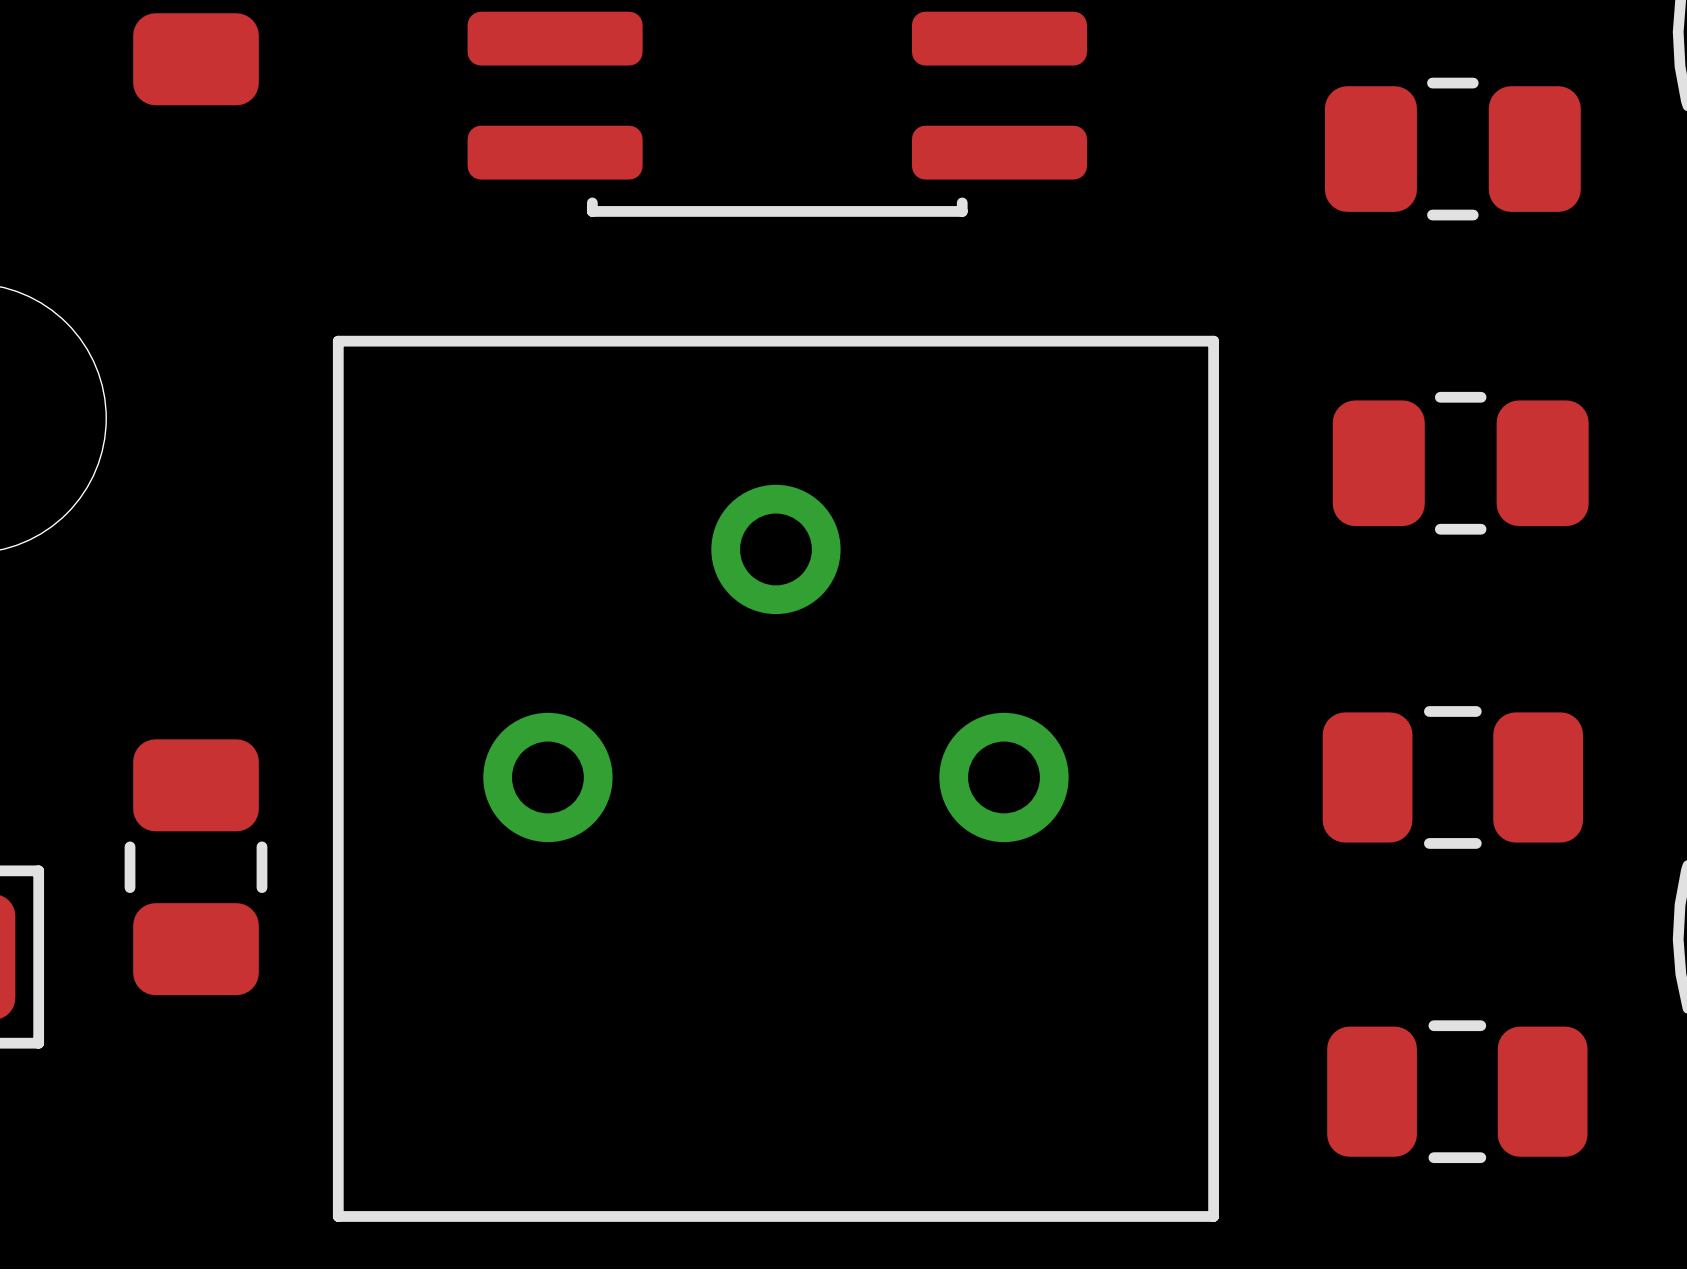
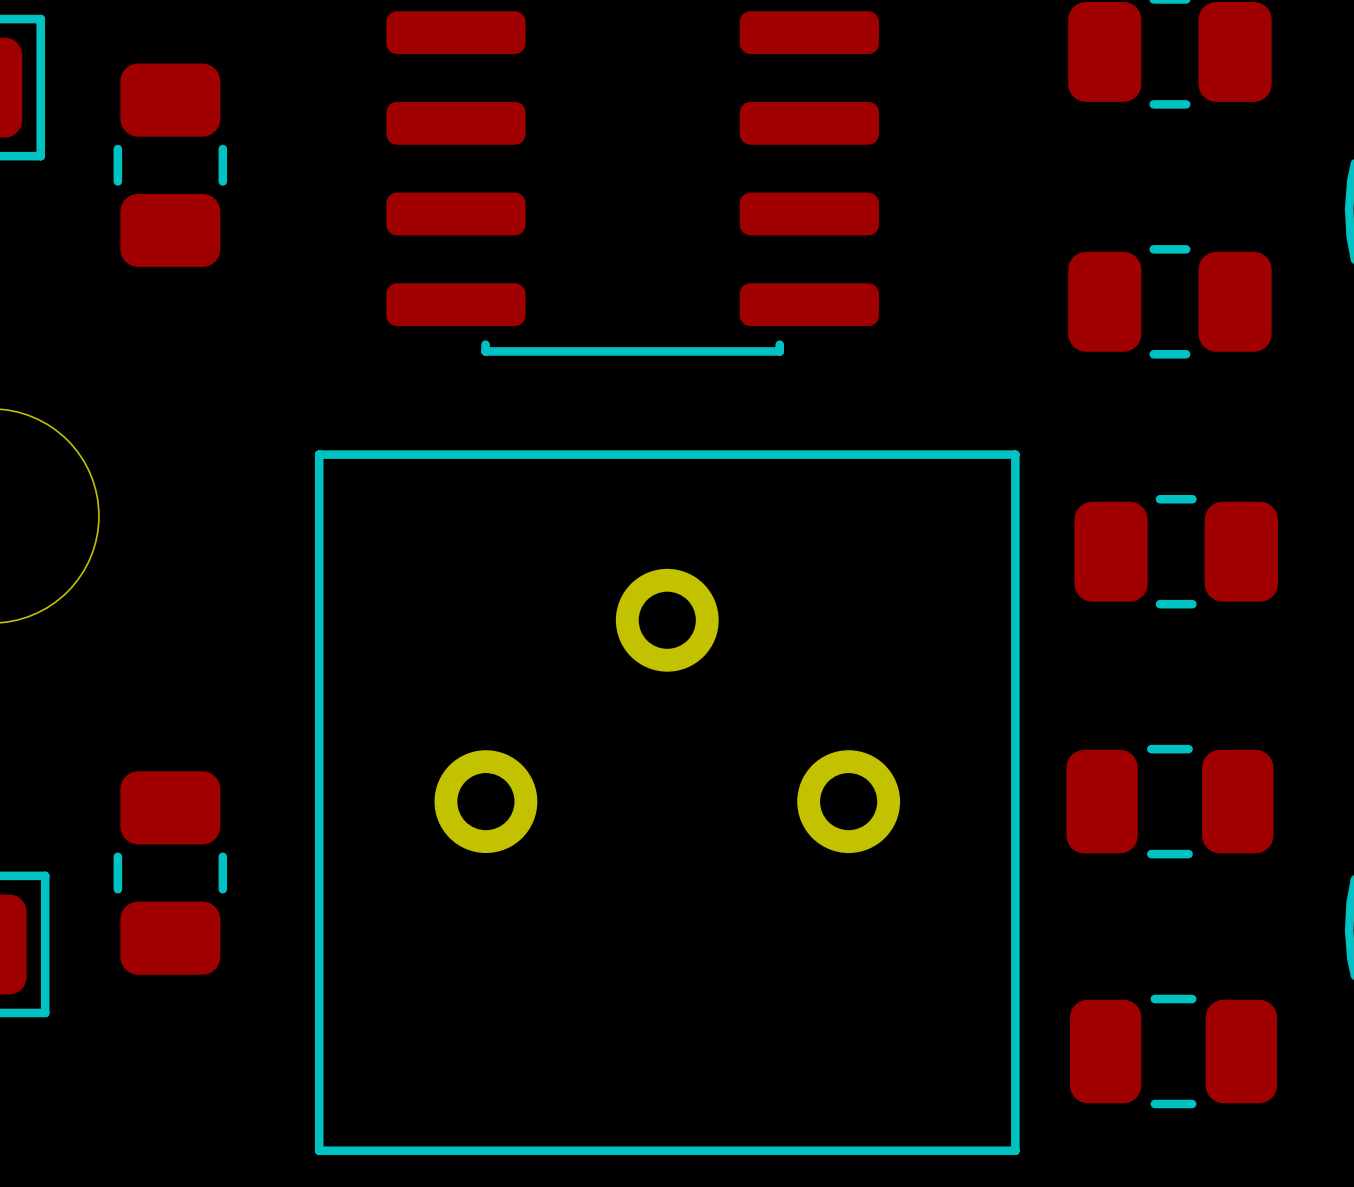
part position: (775, 778) -> (667, 802)

